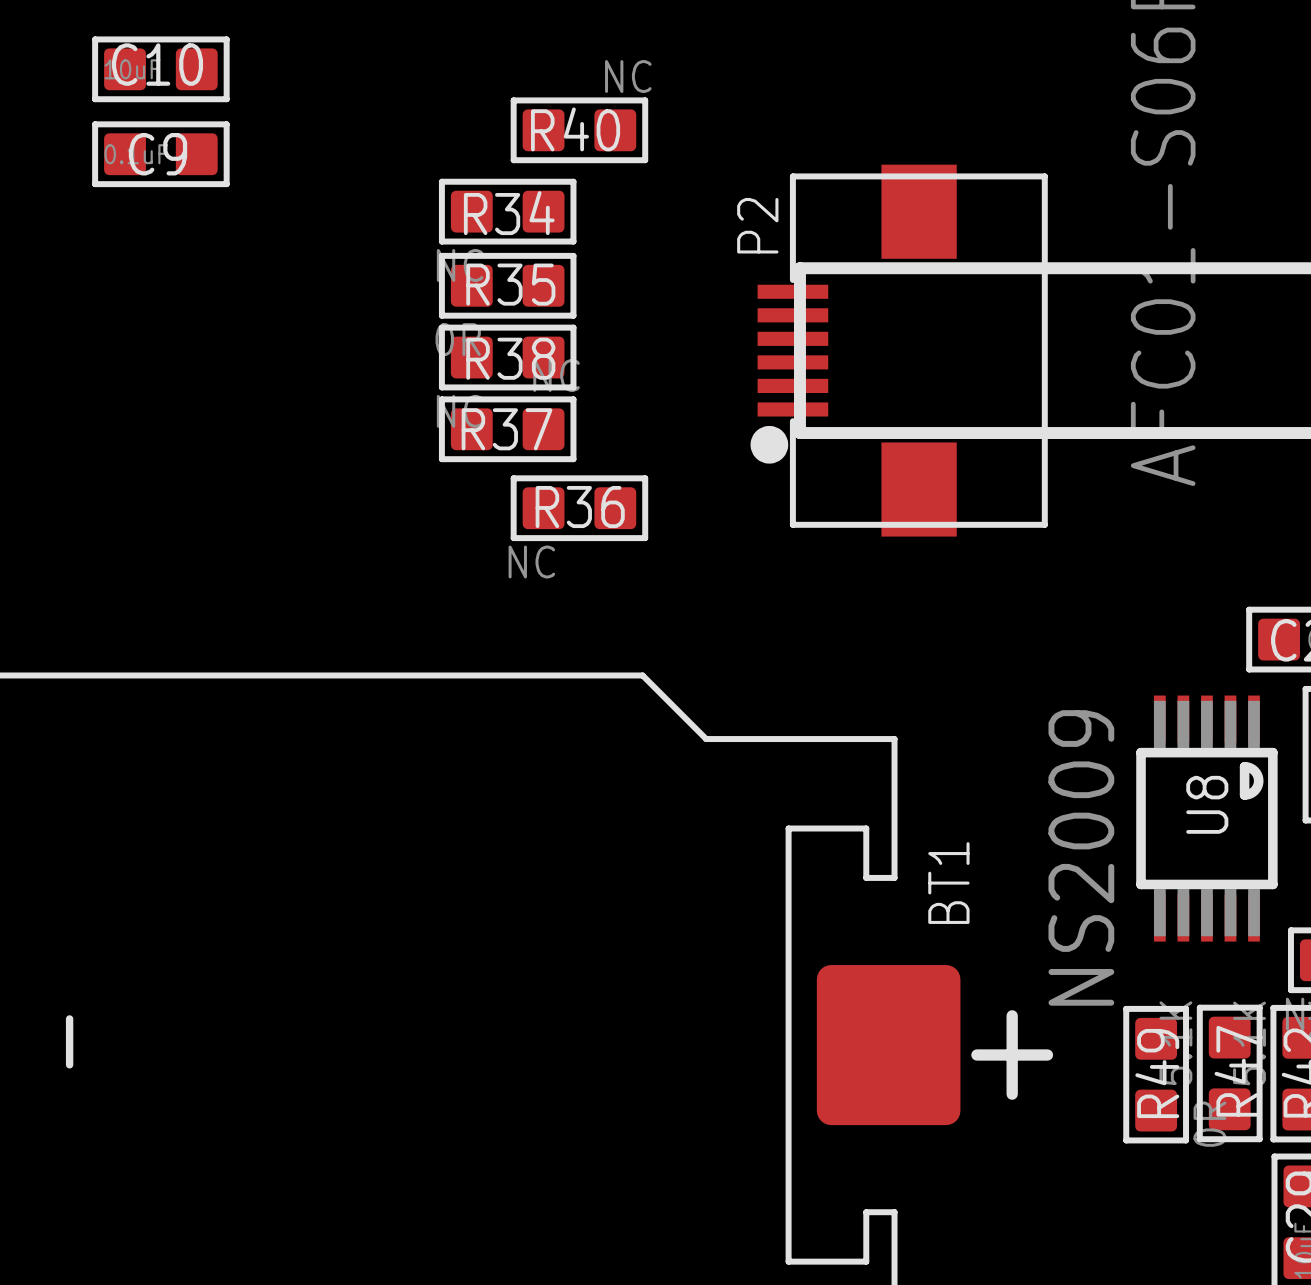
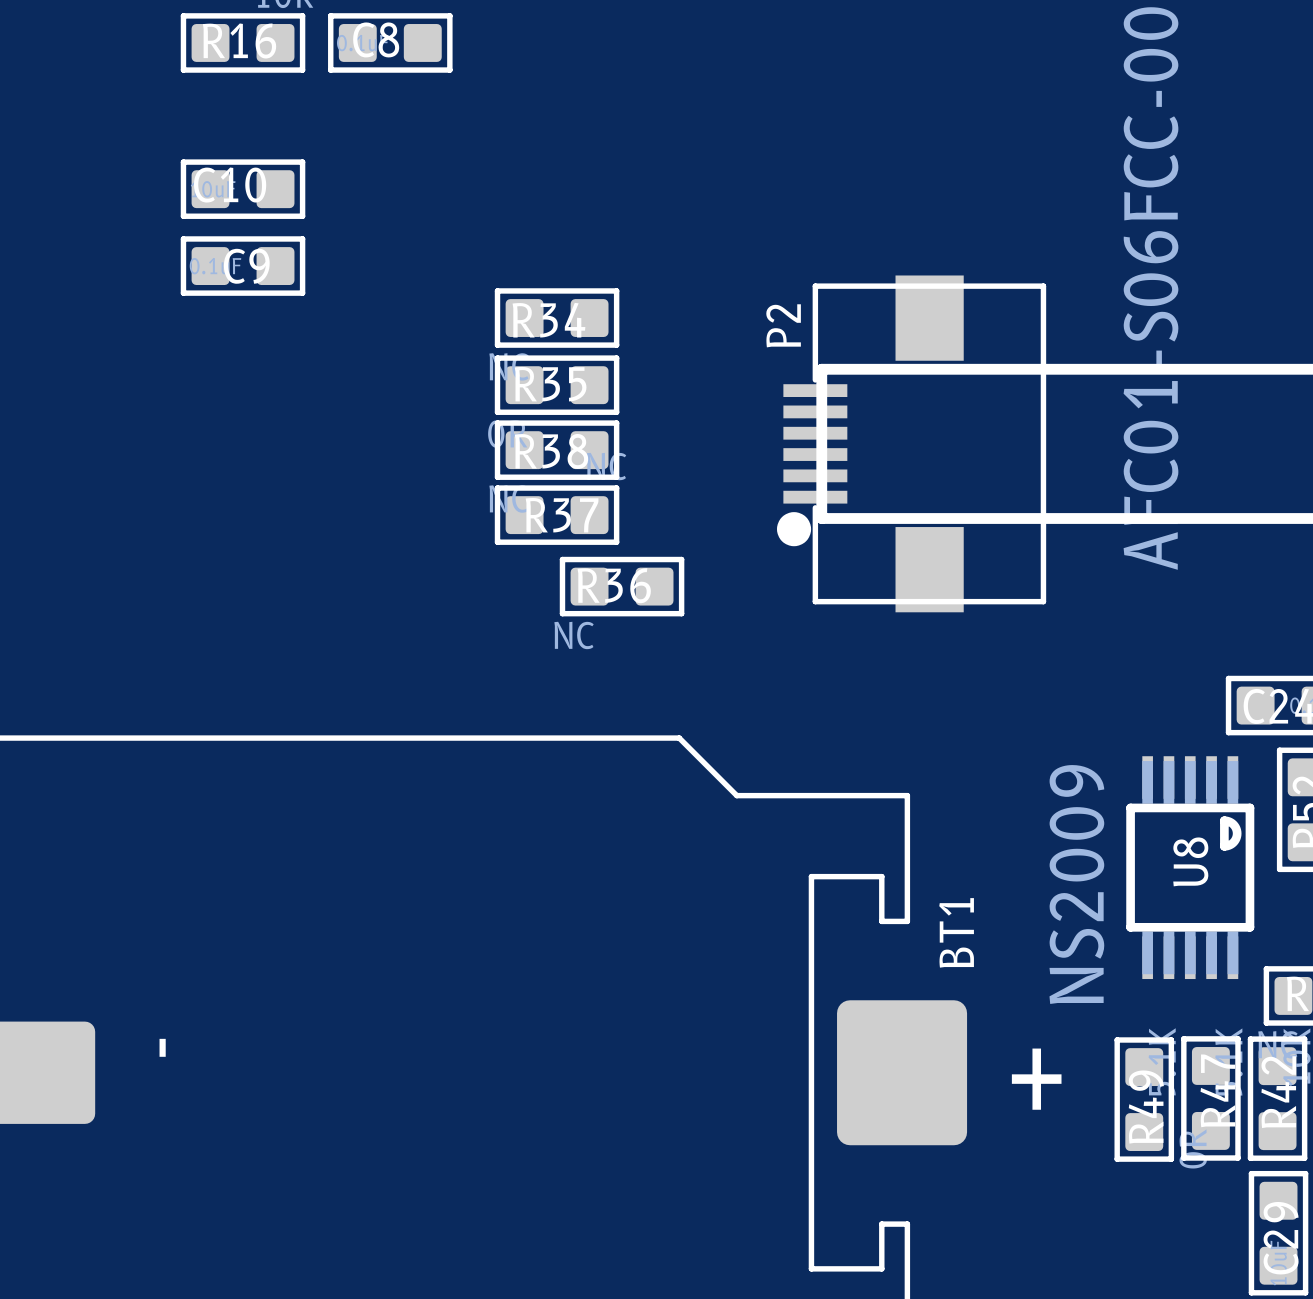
R40: NC (579, 130) -> none

